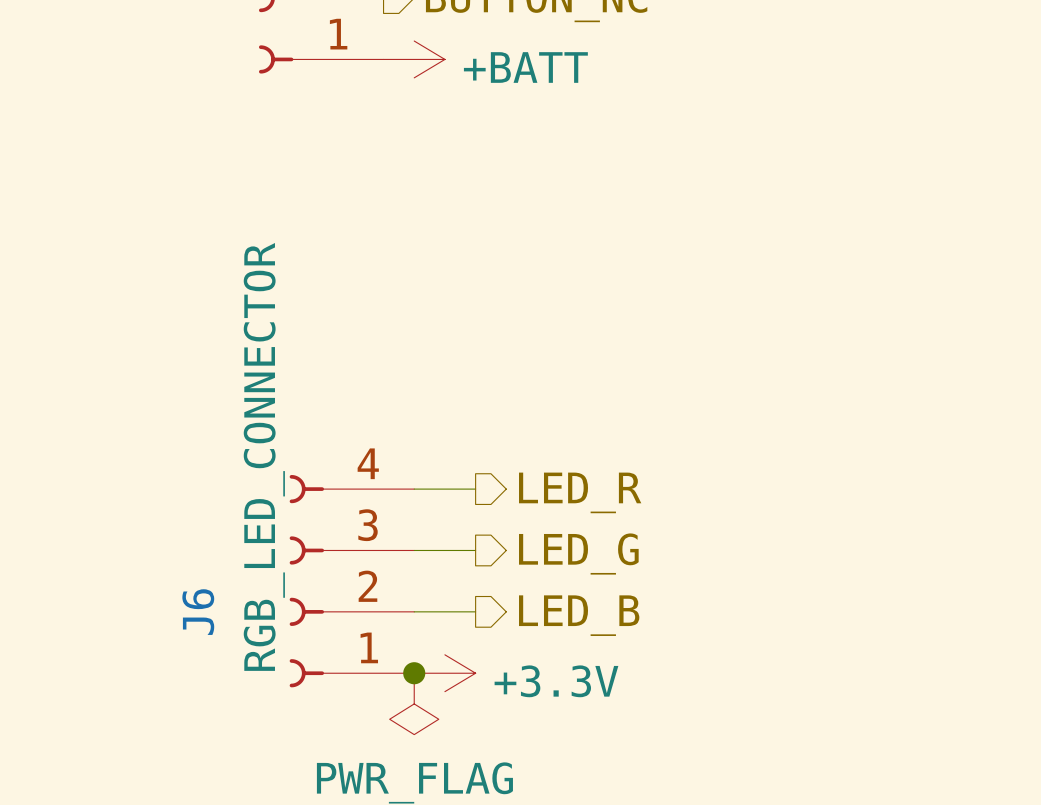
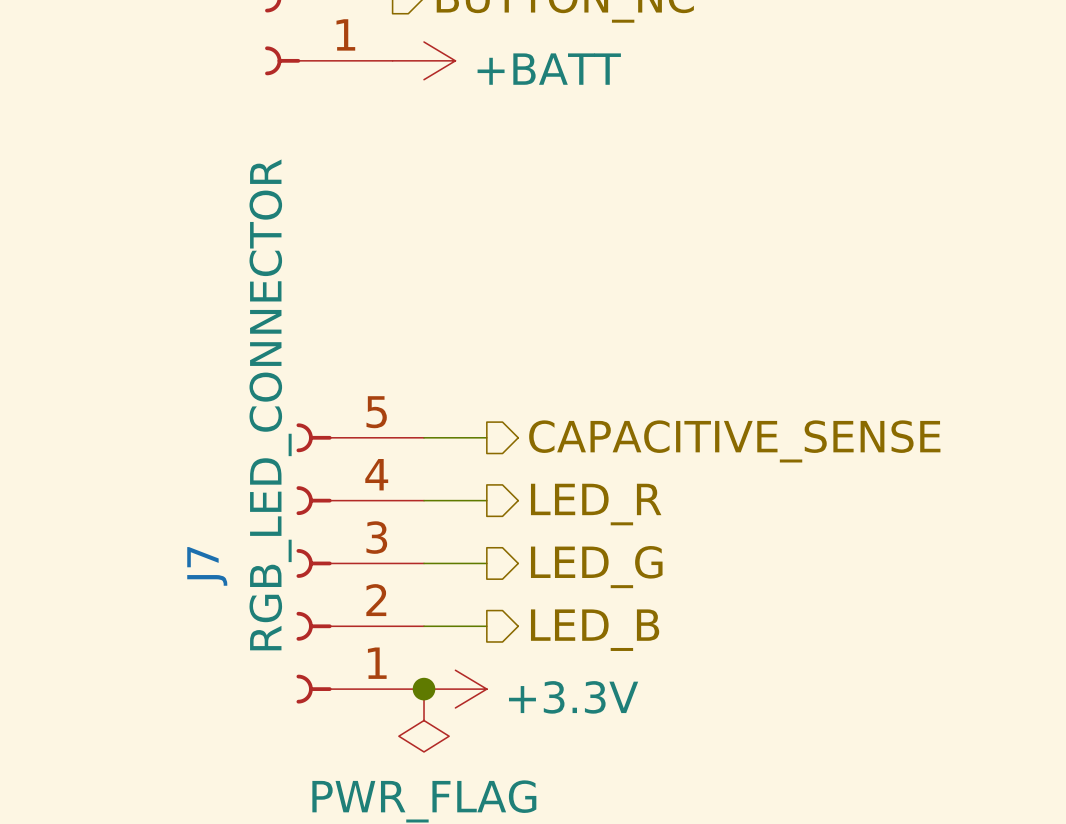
wire: none -> (424, 437) (486, 437)
hierarchical label: none -> CAPACITIVE_SENSE (734, 441)
J7: none -> RGB_LED_CONNECTOR (360, 563)
J6: RGB_LED_CONNECTOR (351, 581) -> none

